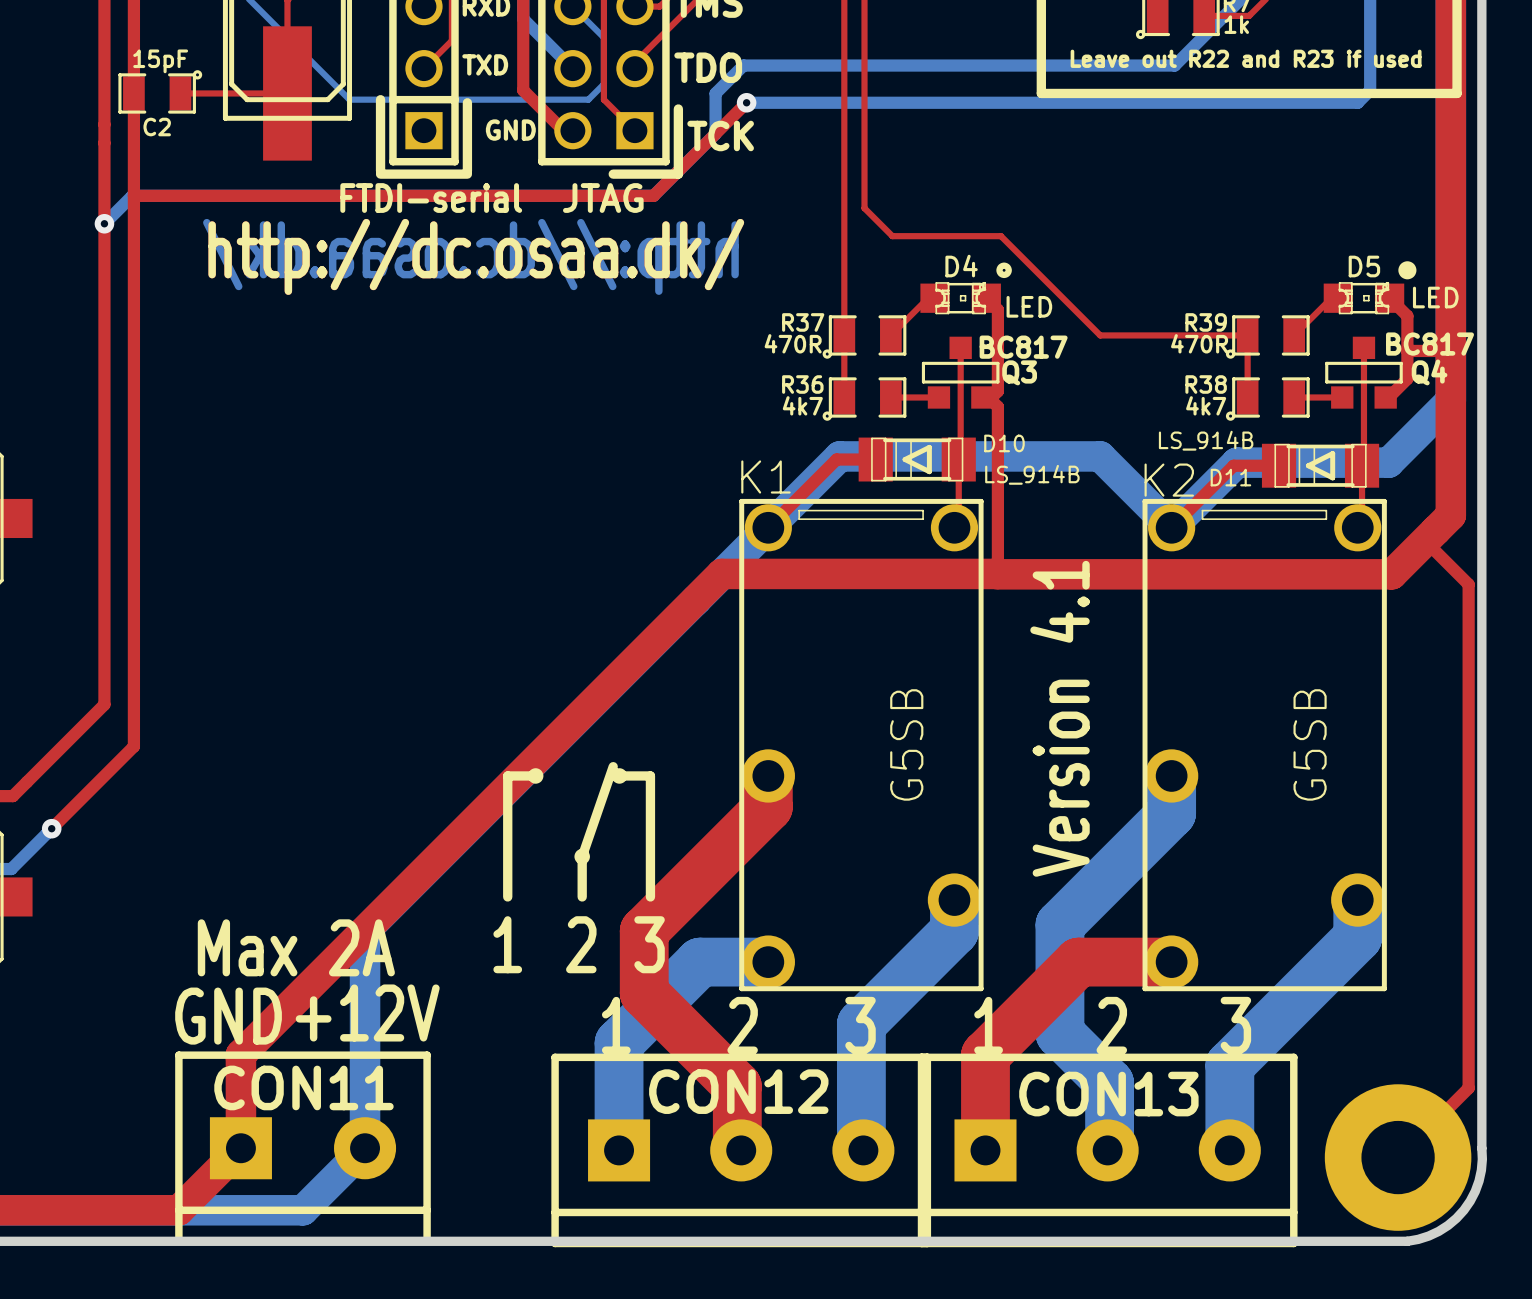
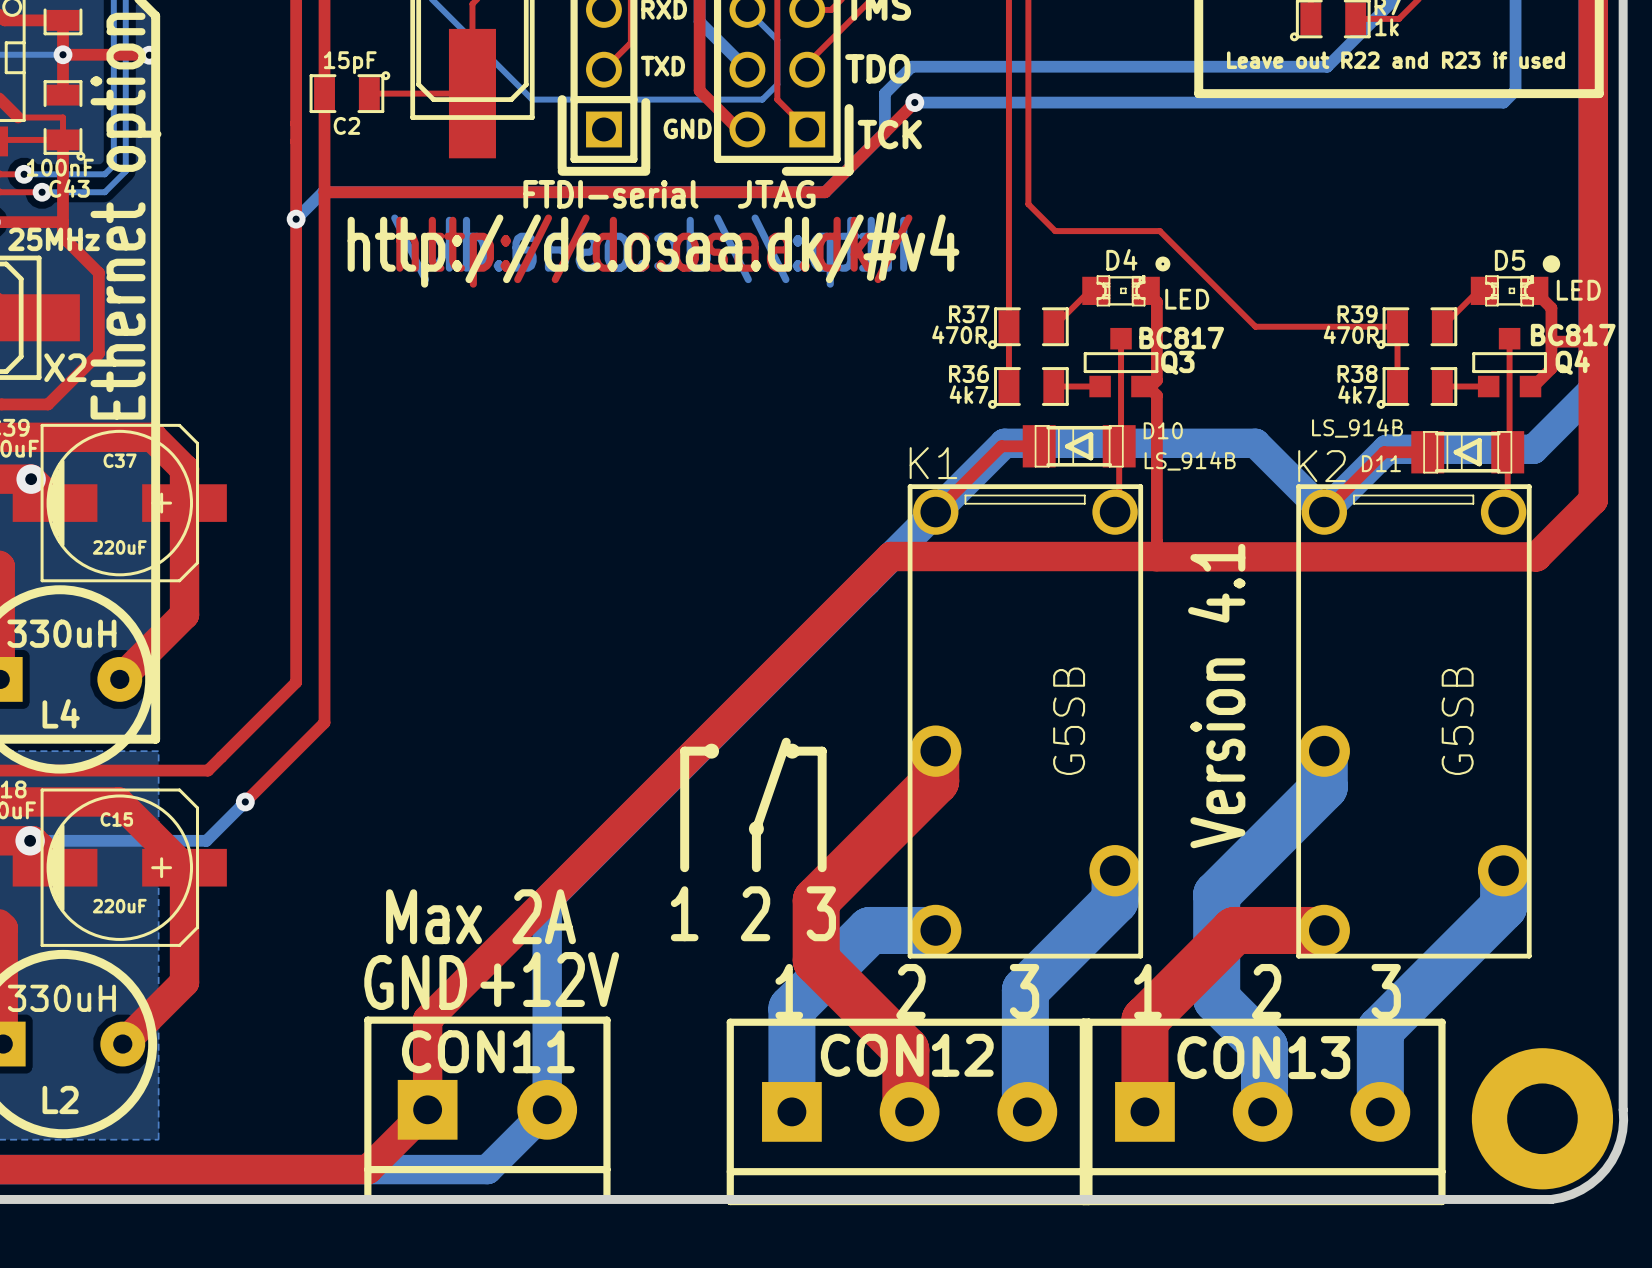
text: http://dc.osaa.dk/ (476, 256) -> http://dc.osaa.dk/#v4 (653, 249)
top track: (1435, 530) (1435, 541) (1425, 541) (1468, 584) (1468, 1088) (1398, 1157) -> none

